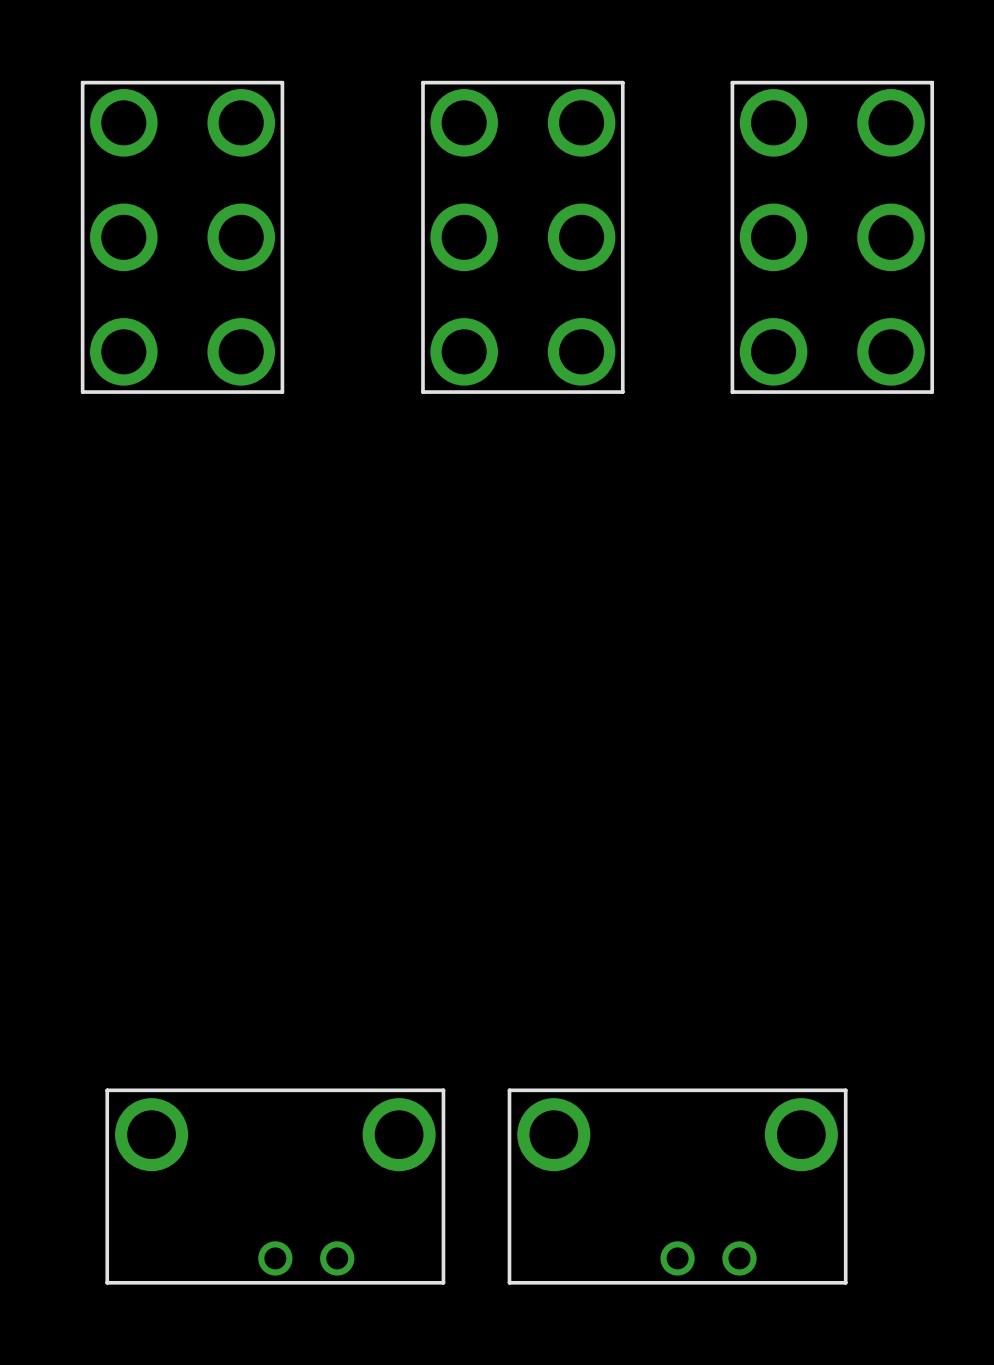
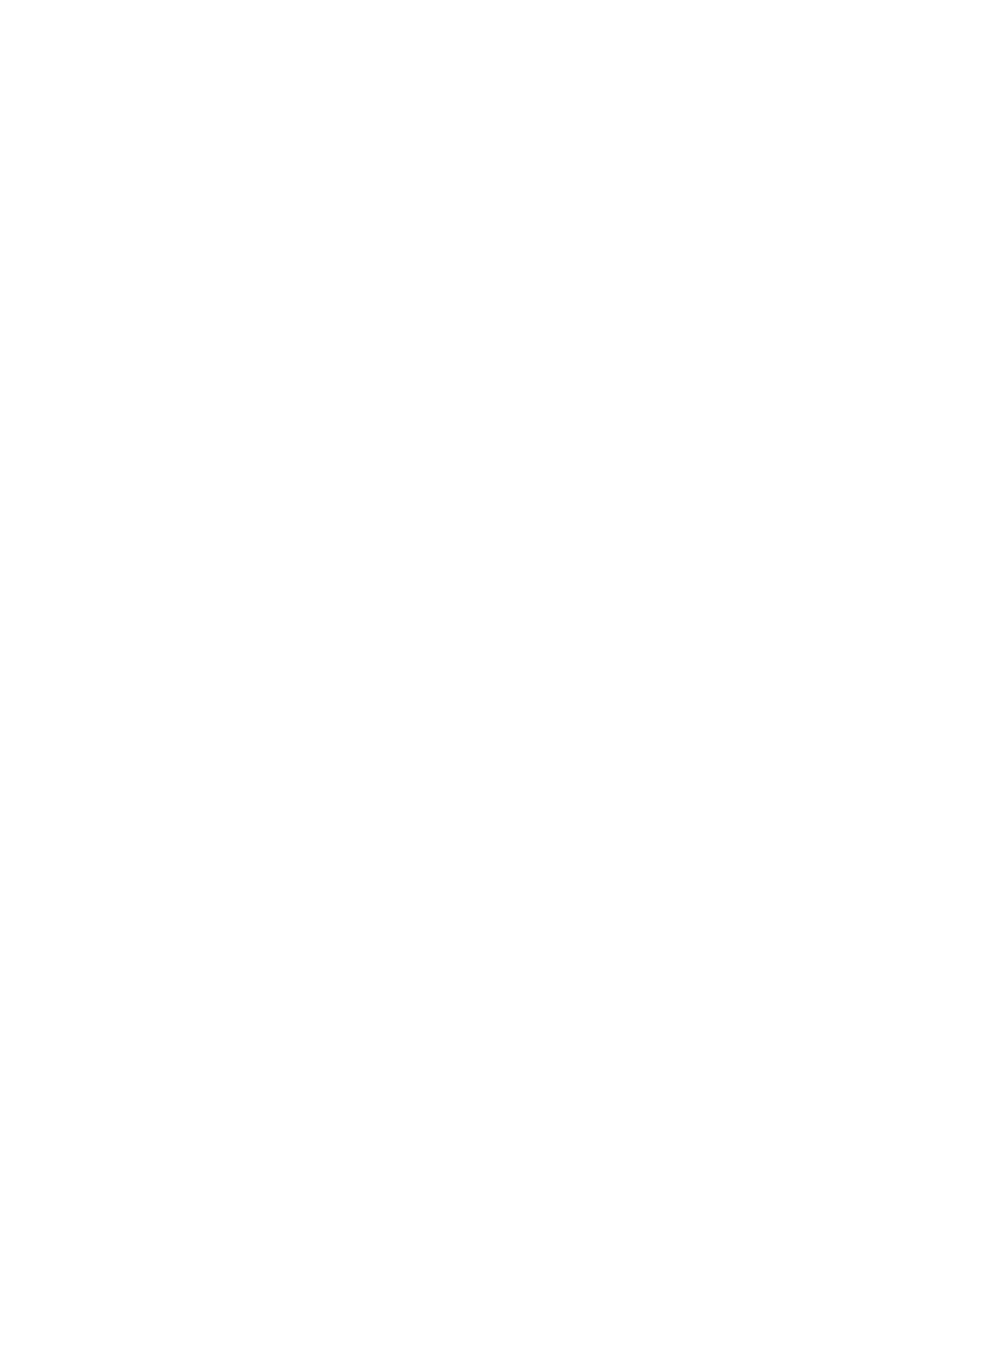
part: (182, 237) -> none
part: (522, 237) -> none
part: (832, 237) -> none
part: (275, 1186) -> none
part: (677, 1186) -> none

